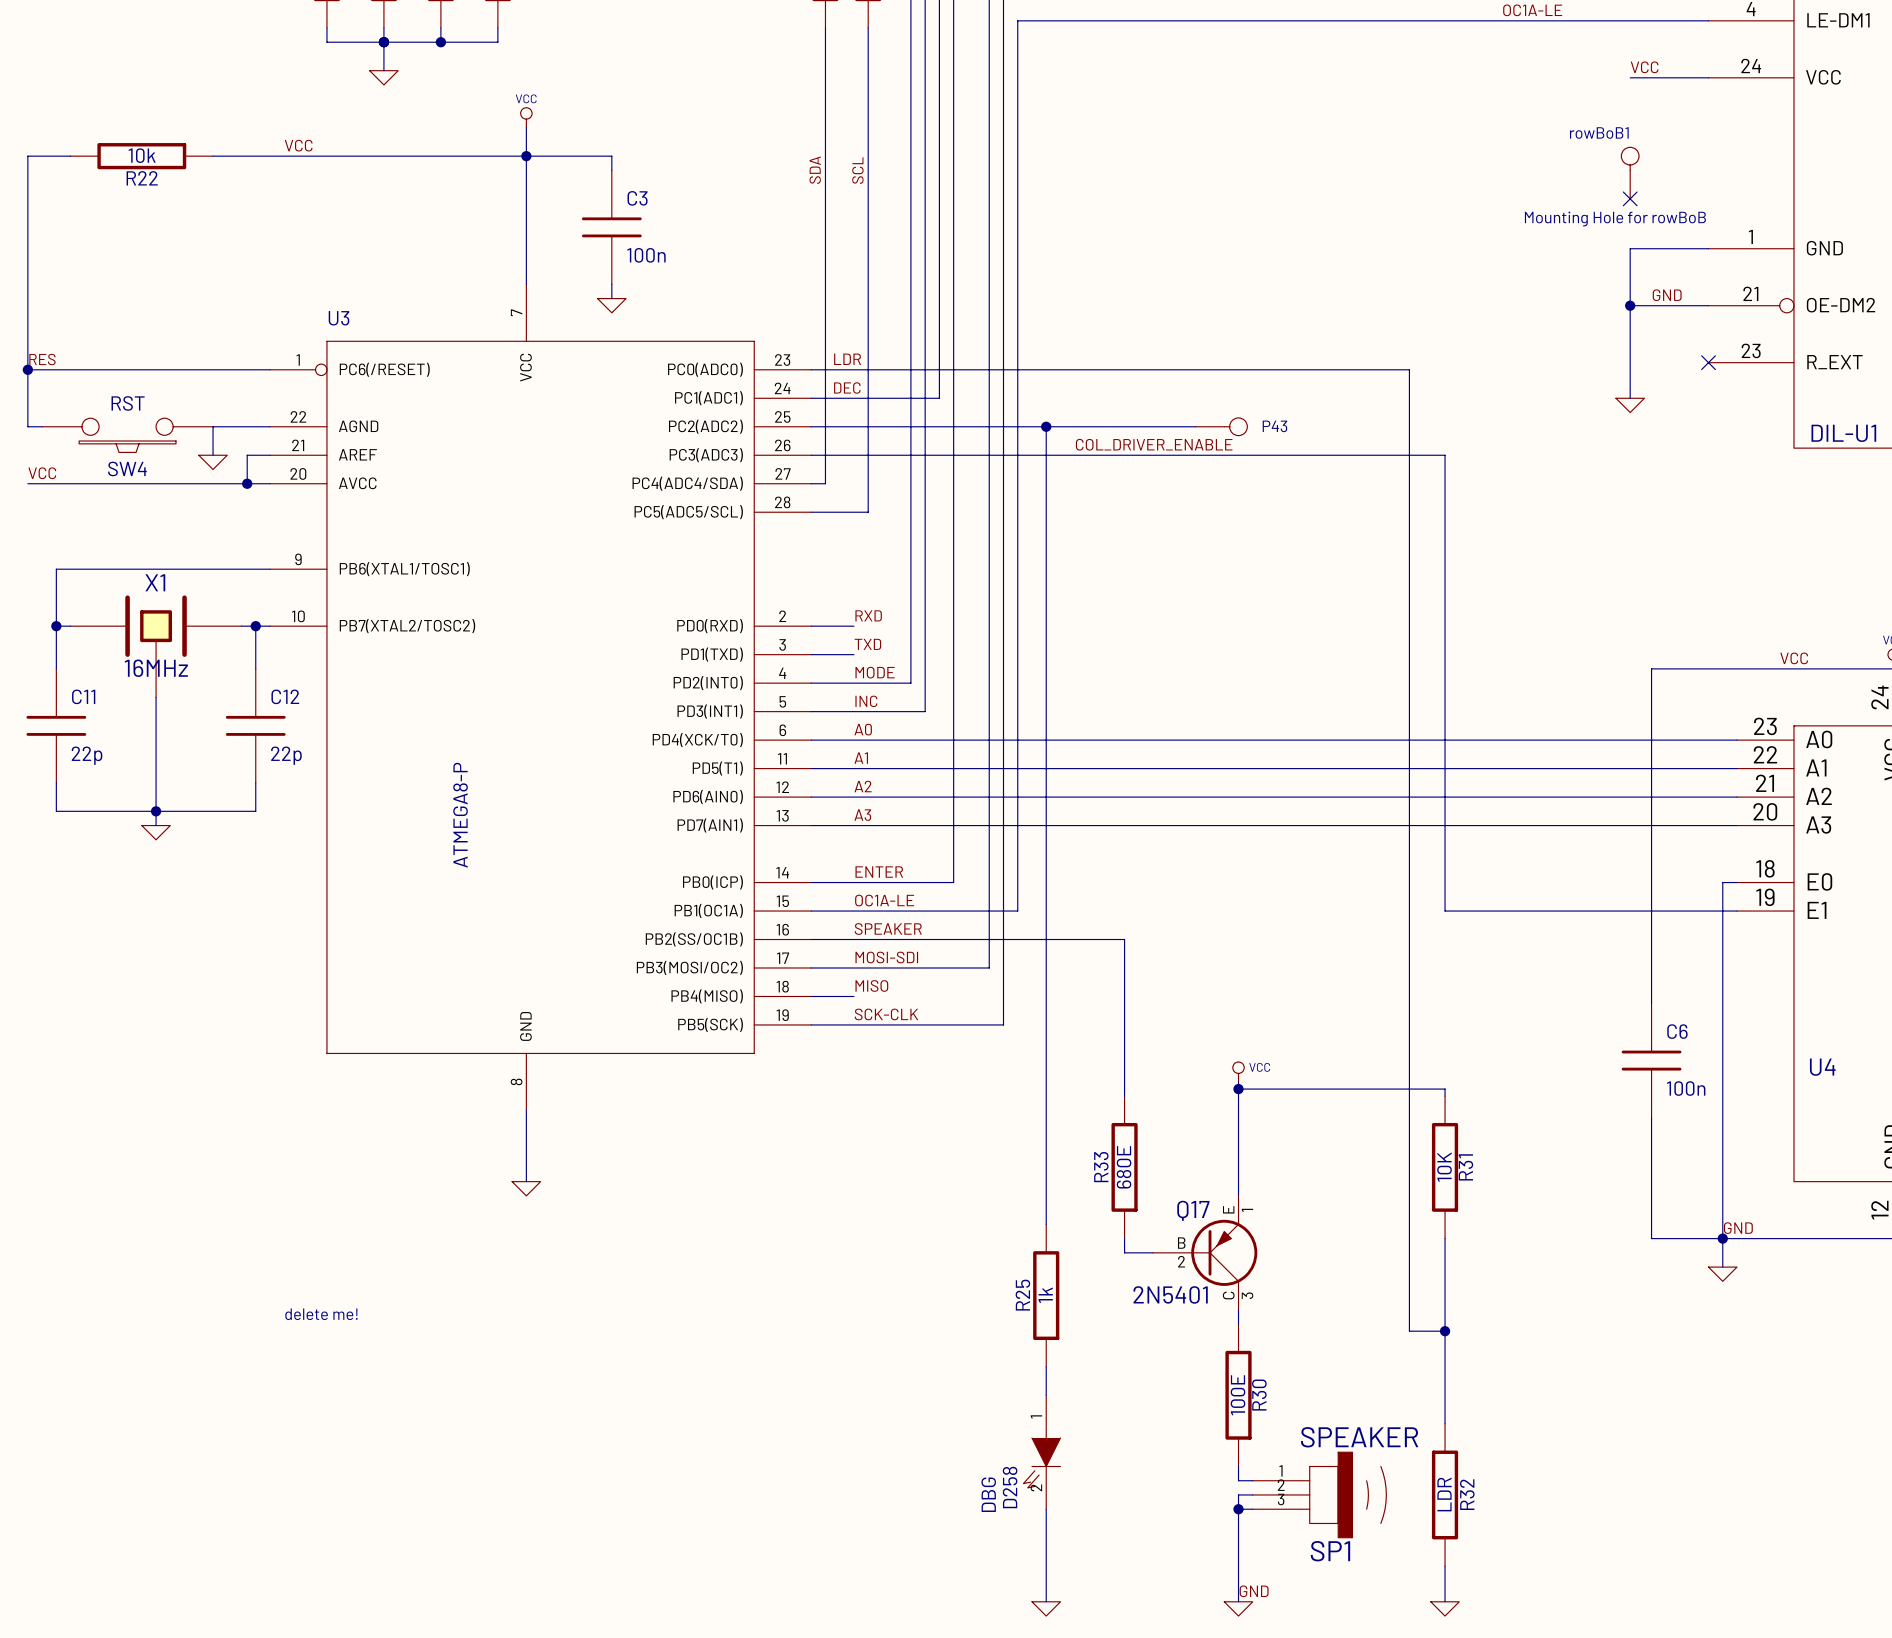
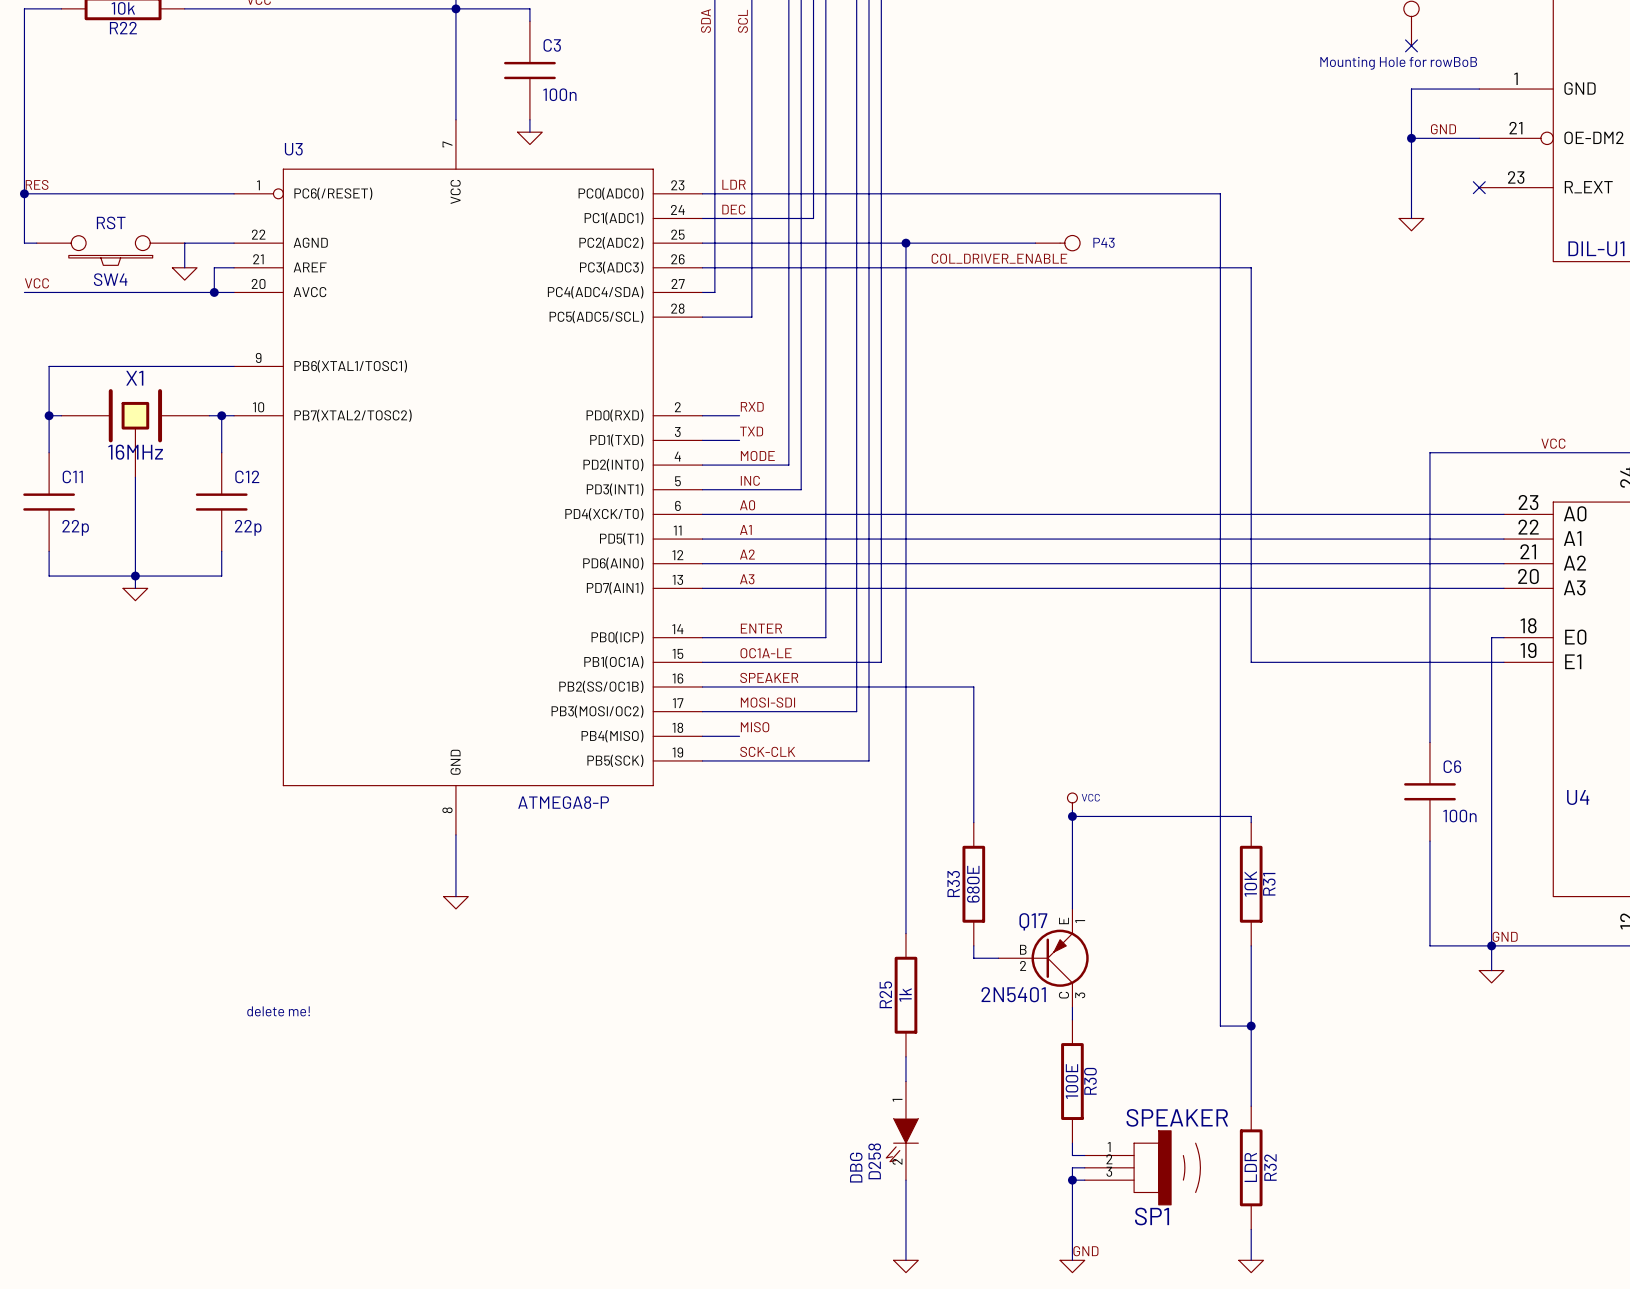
U3 value rotation: 0° (460, 815) -> 90° clockwise (563, 802)
U3 value position: ATMEGA8-P (460, 815) -> ATMEGA8-P (563, 802)

